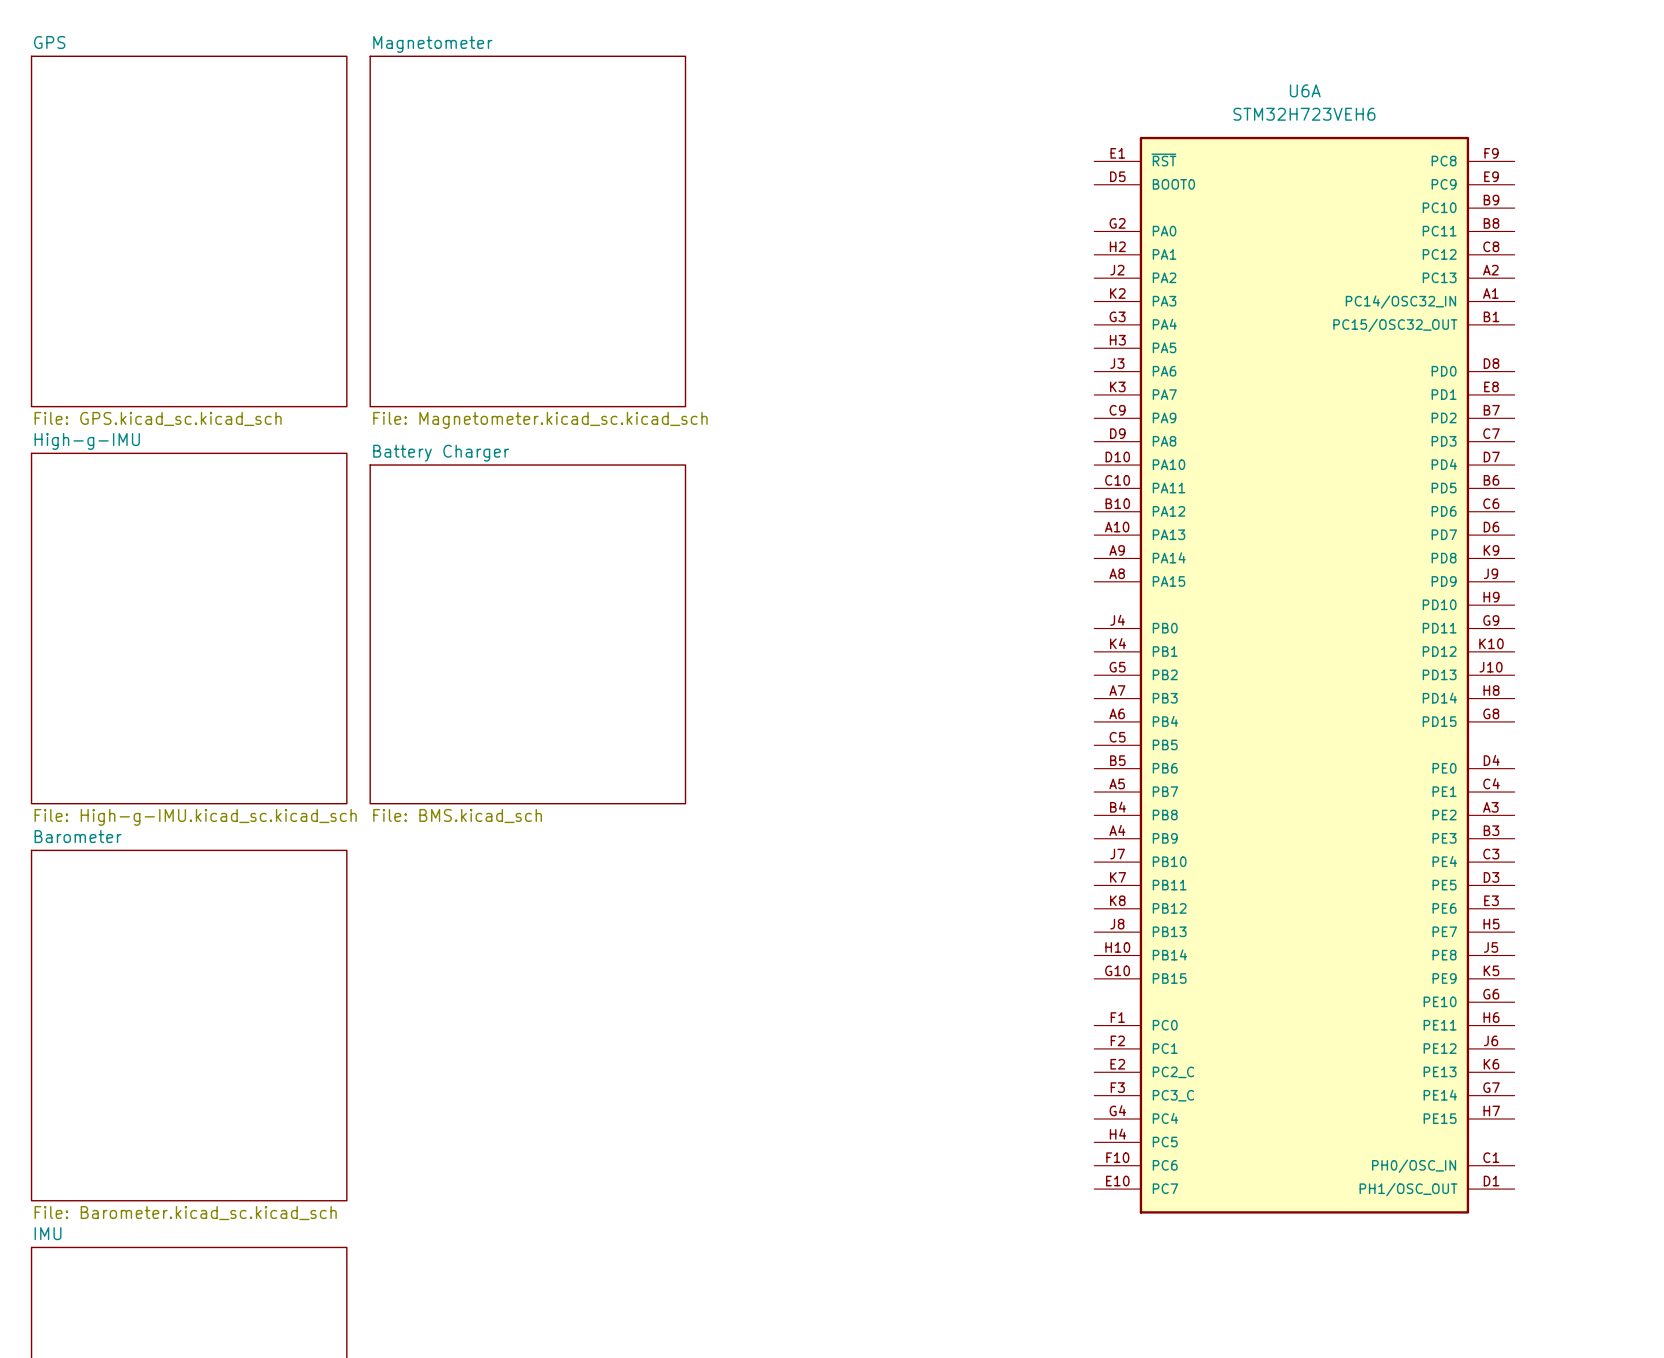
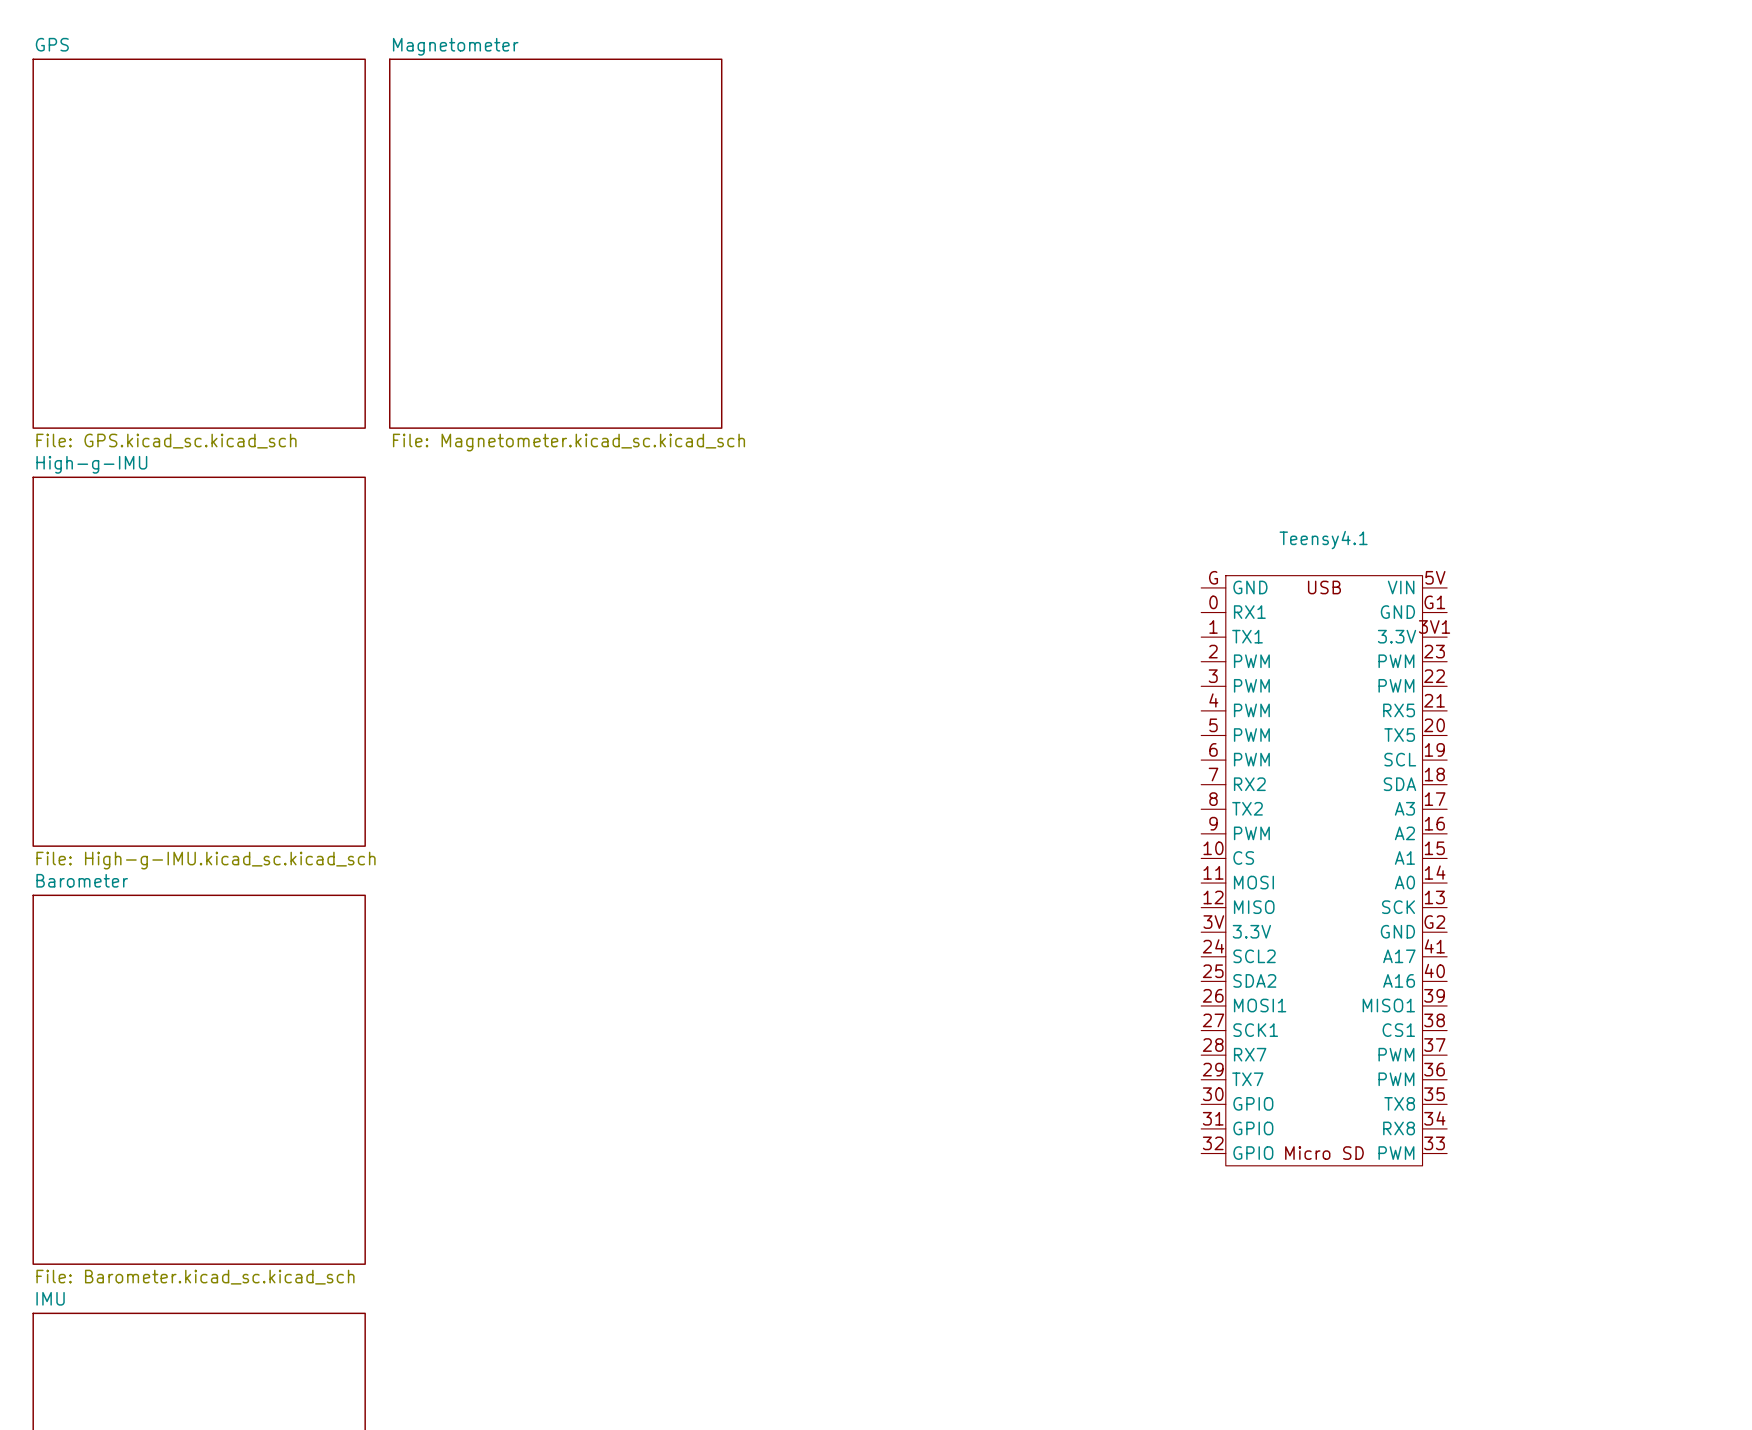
sheet Battery Charger: File: BMS.kicad_sch (527, 634) -> none
U6A: STM32H723VEH6 (1304, 675) -> none
Teensy4.1: none -> (1324, 870)

